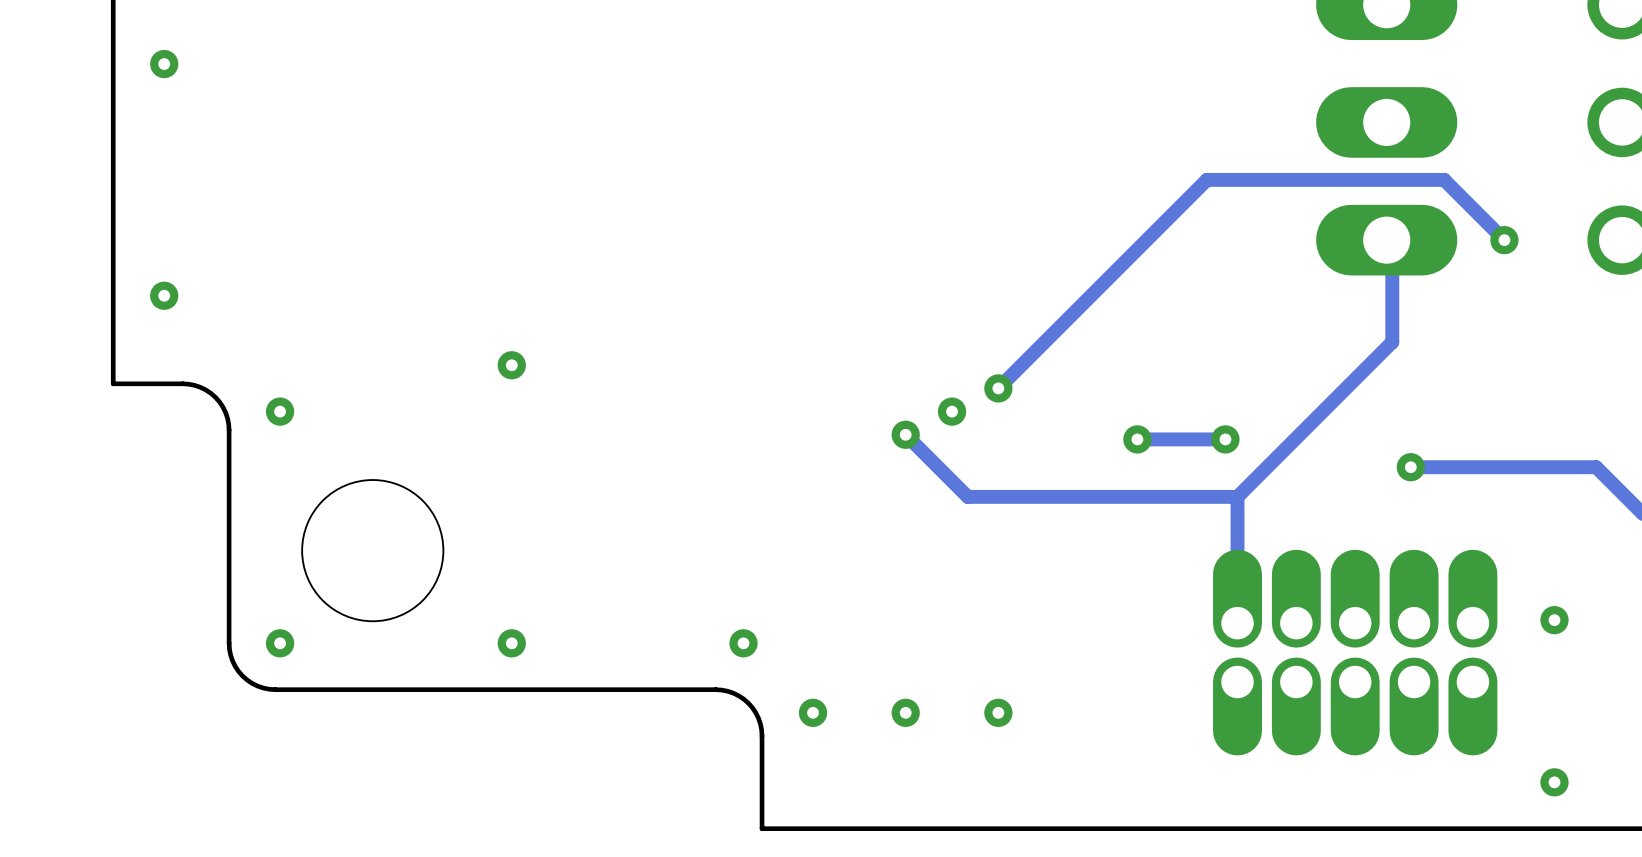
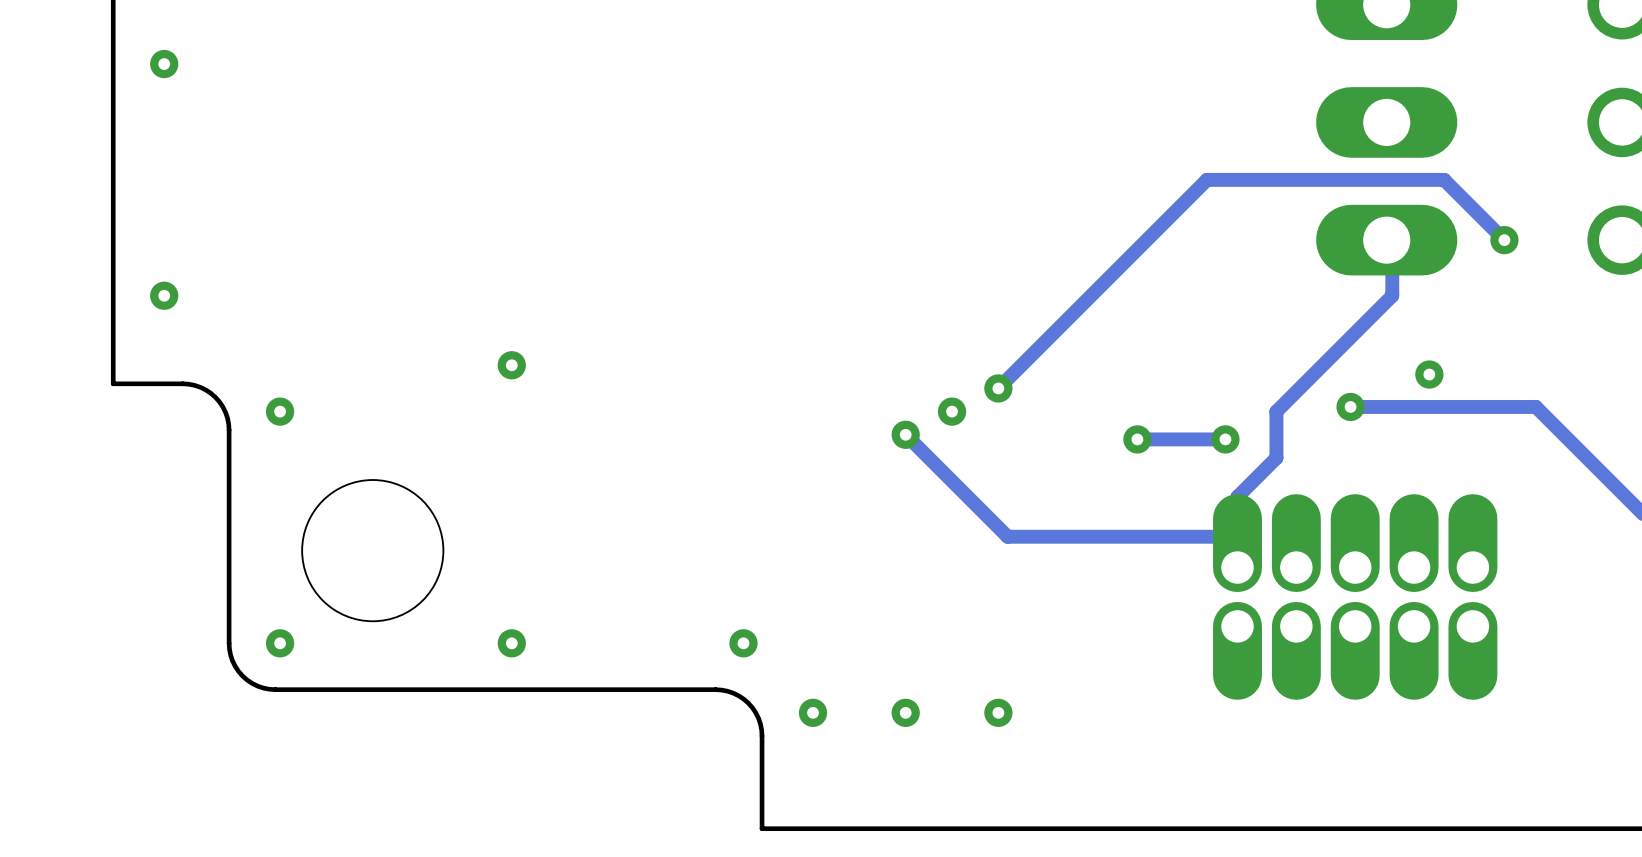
track: (1392, 295) (1392, 342) (1276, 457) -> (1392, 295) (1276, 411) (1276, 457)
via: none -> (1429, 374)
via: none -> (1350, 406)
via: (1410, 467) -> none
track: (1596, 467) (1410, 467) -> (1596, 467) (1535, 406) (1350, 406)
track: (1237, 496) (967, 496) -> (1237, 536) (1007, 536) (967, 496)
via: (1554, 620) -> none
part position: (1355, 652) -> (1355, 596)
via: (1554, 782) -> none

